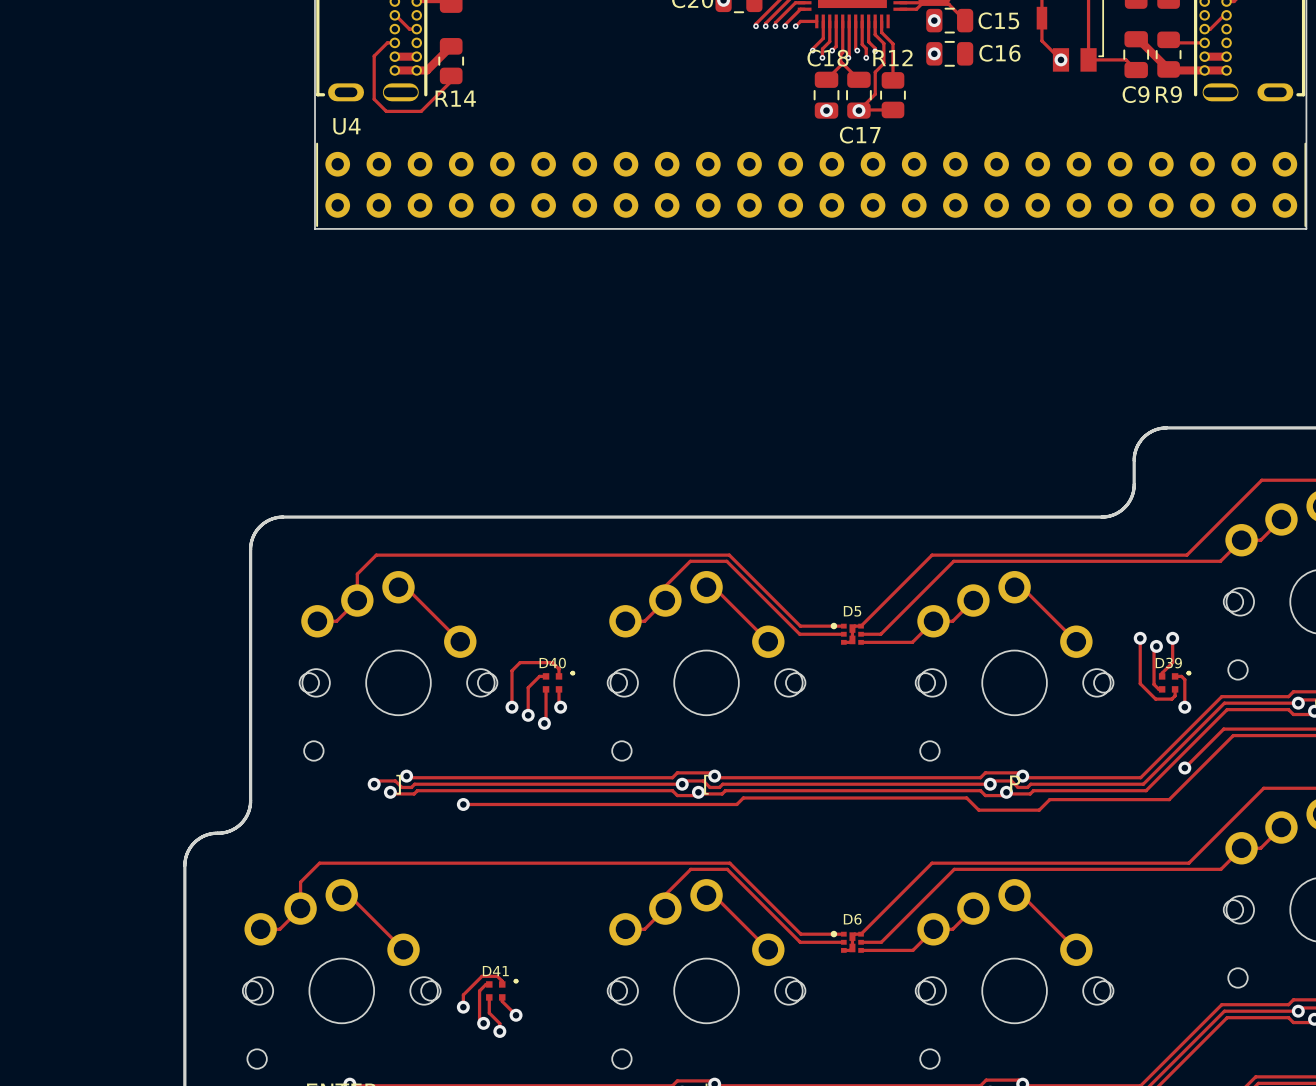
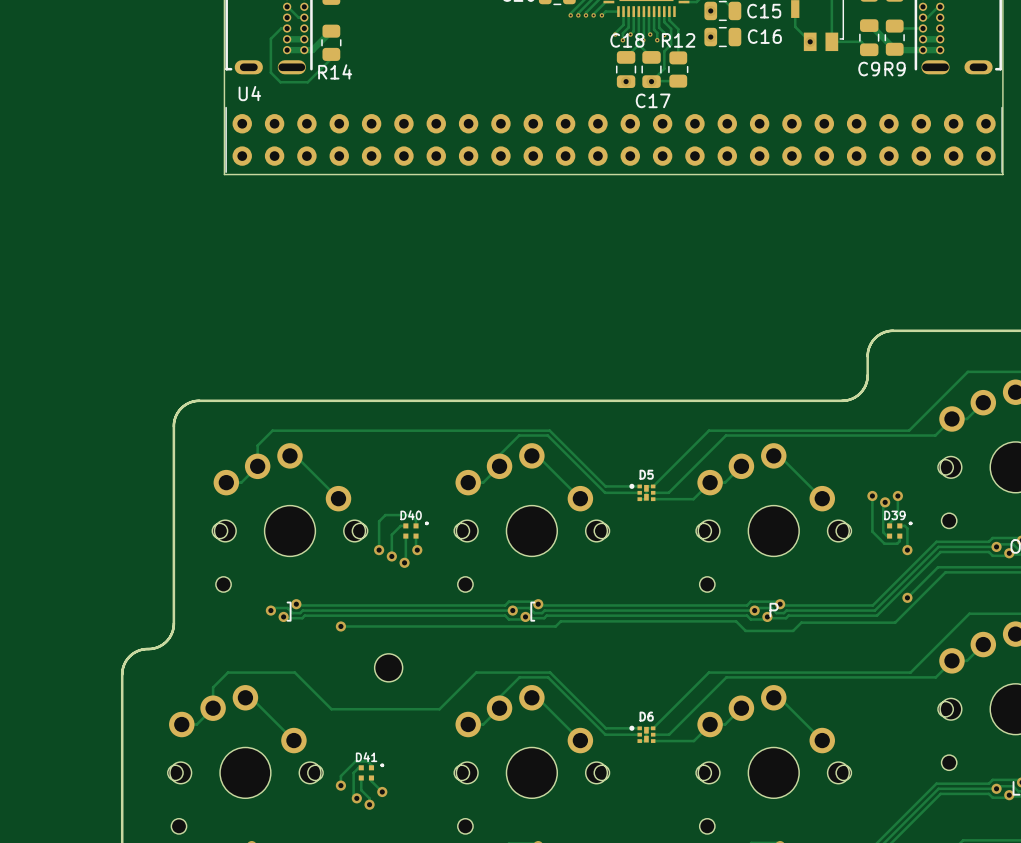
part: none -> (388, 667)
track: (404, 863) (635, 863) -> (294, 672) (331, 709) (439, 709) (476, 672)

